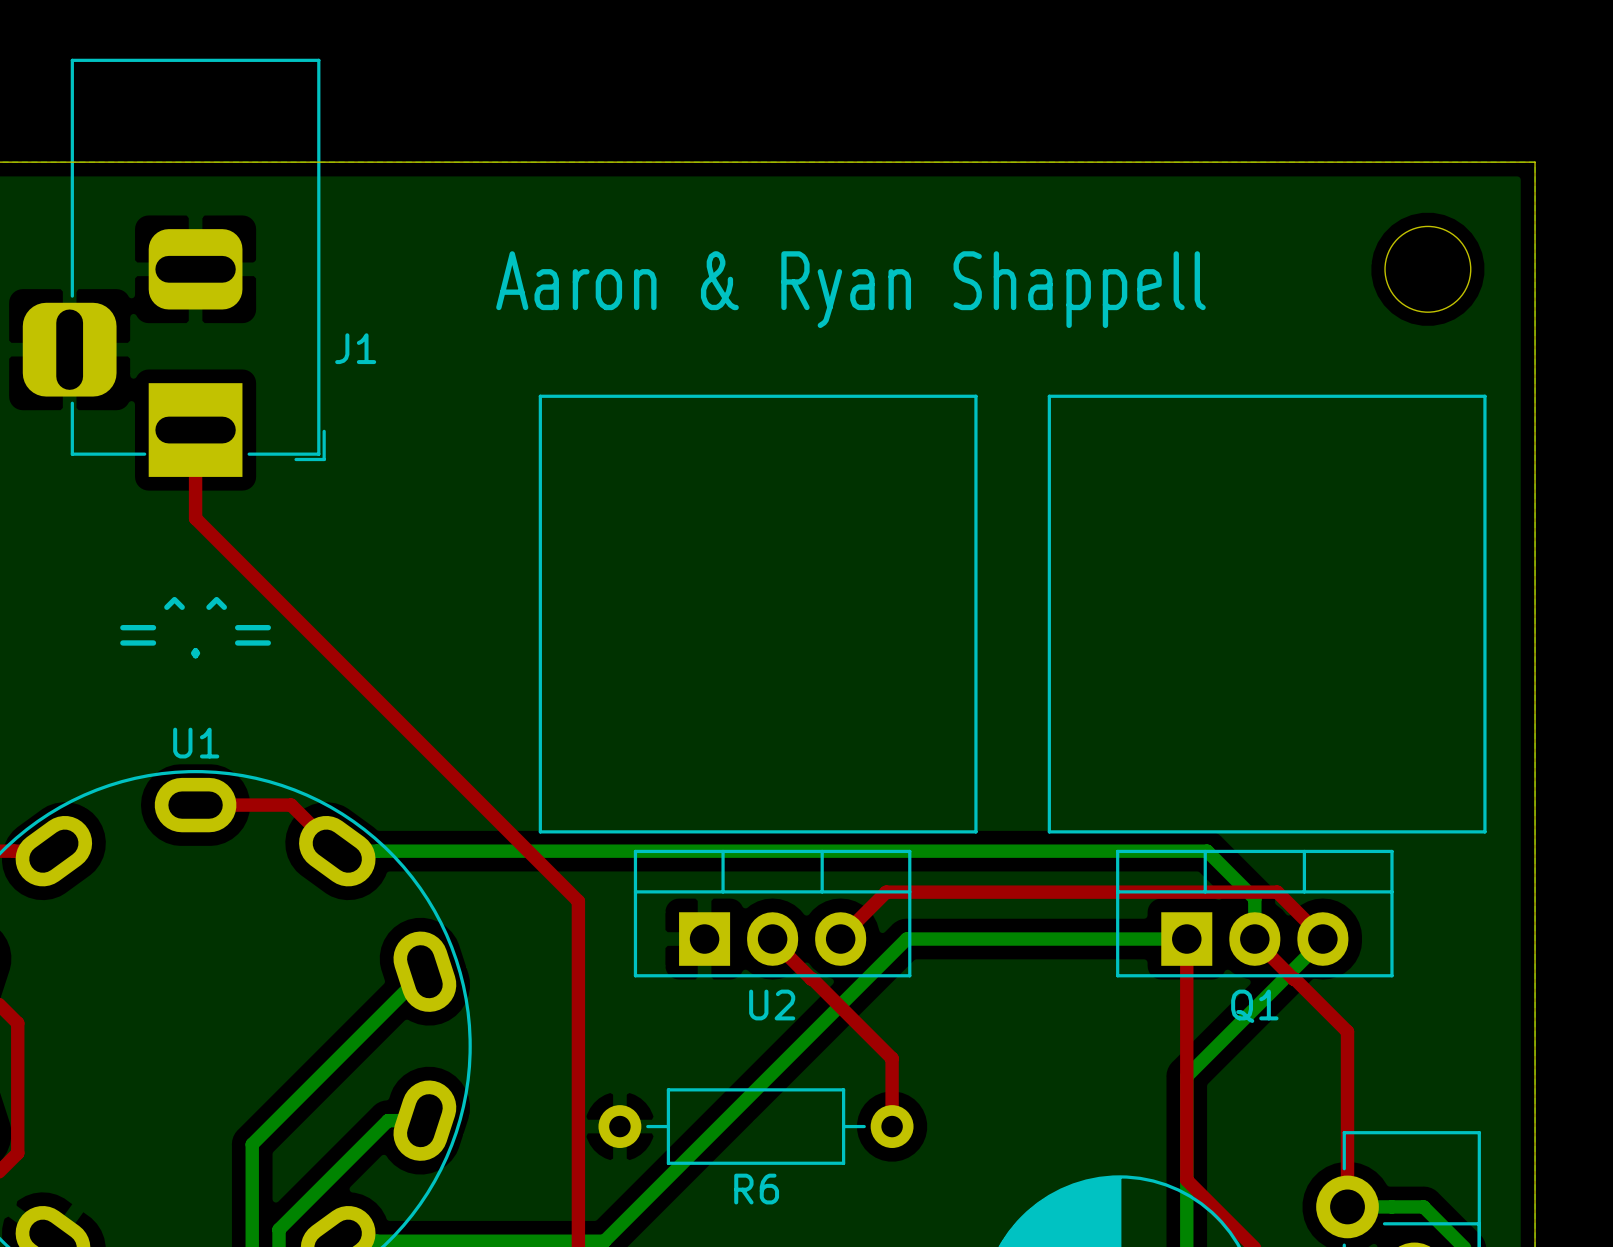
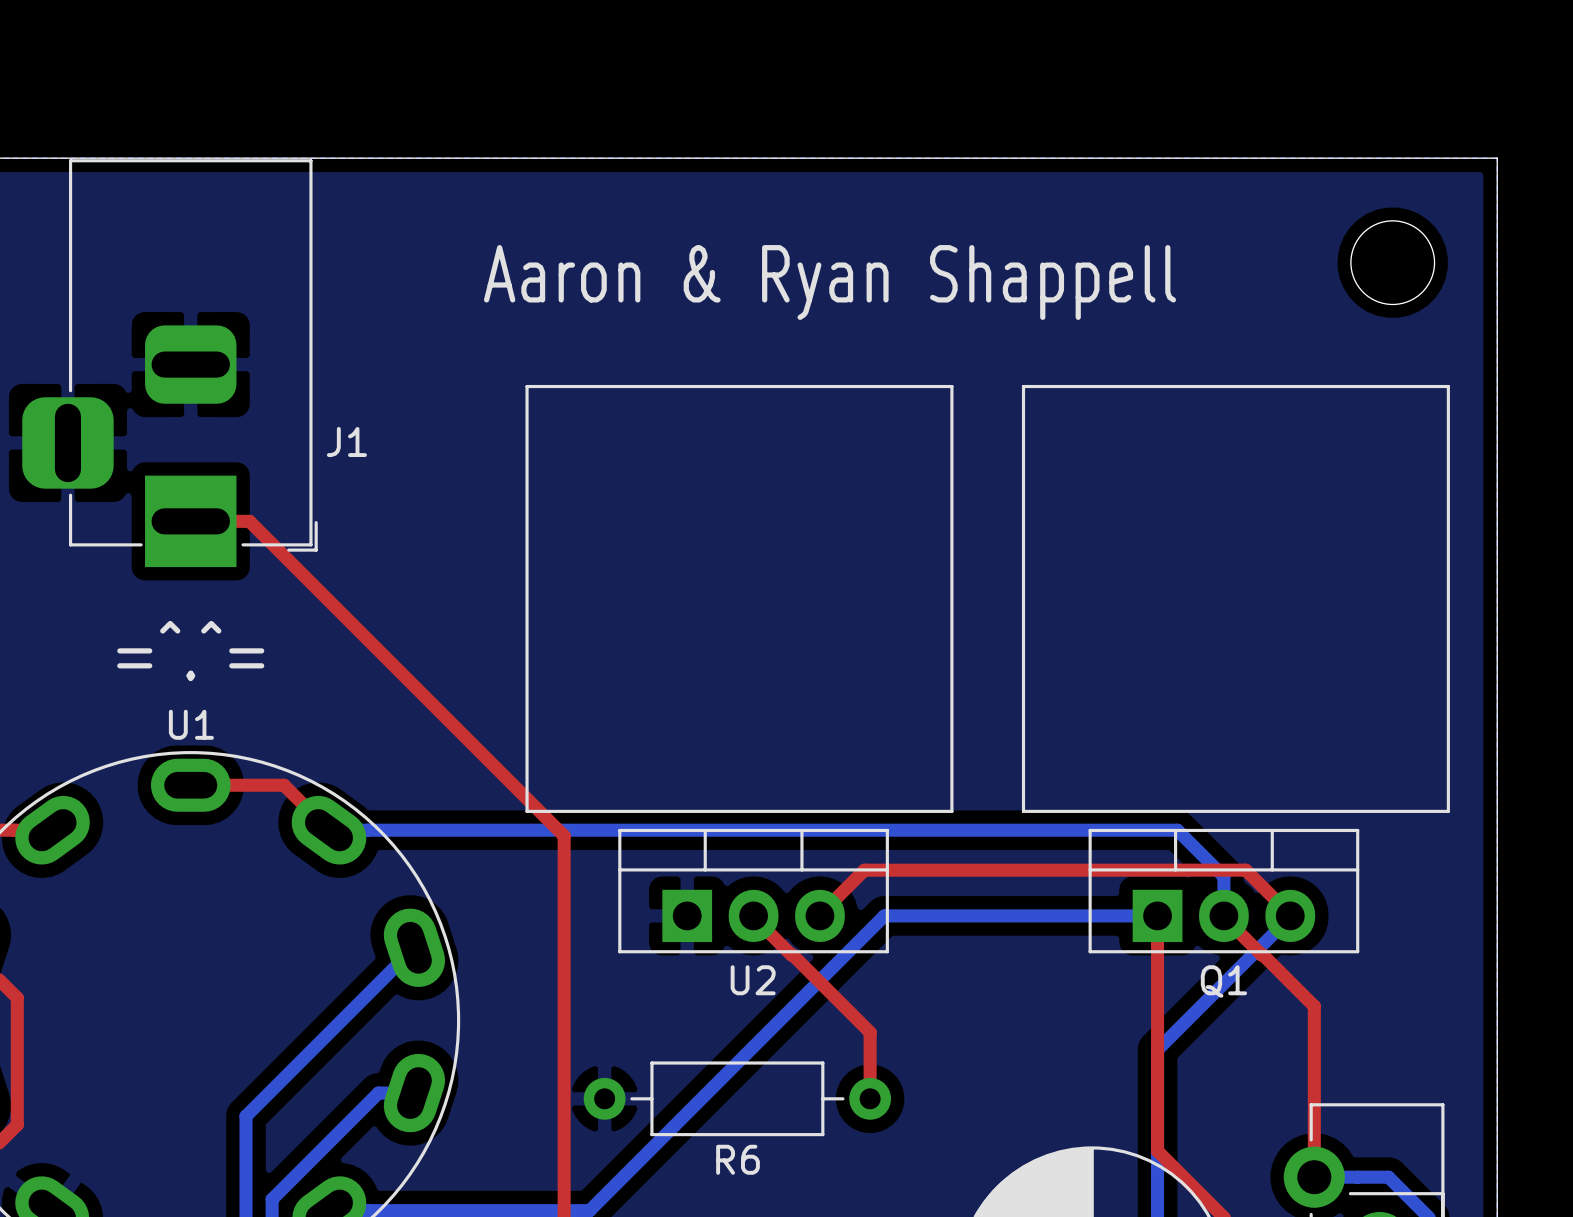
J1 position: (174, 267) -> (169, 363)
top track: (195, 430) (195, 518) (578, 901) -> (190, 521) (249, 521) (564, 835) (564, 879)
text position: =^.^= (195, 627) -> =^.^= (190, 650)

